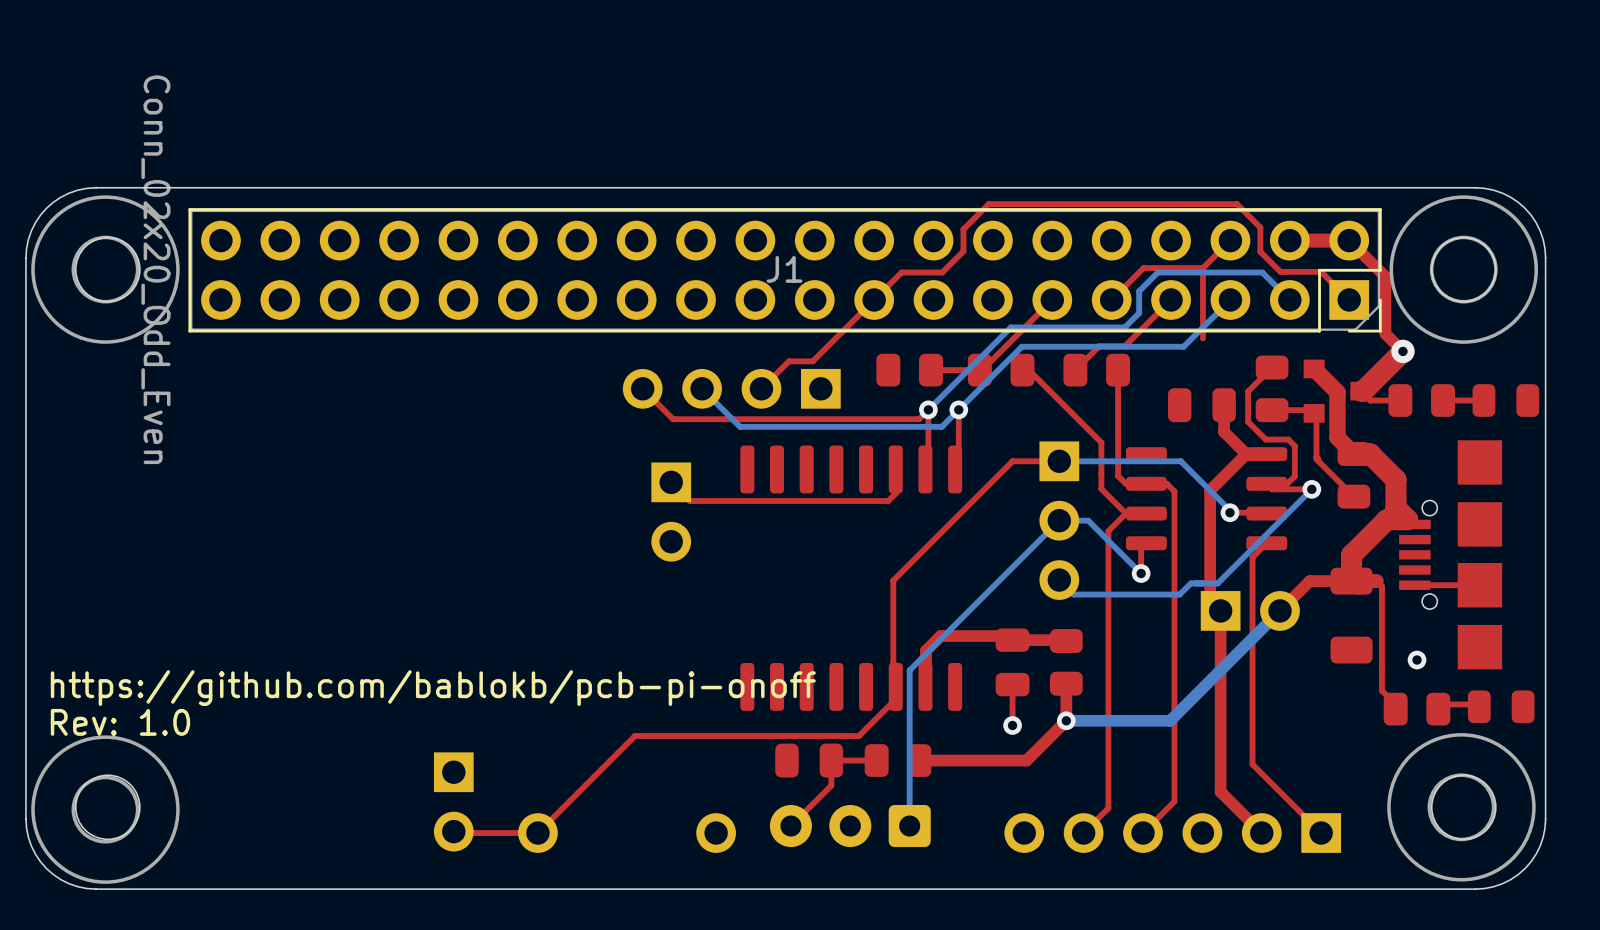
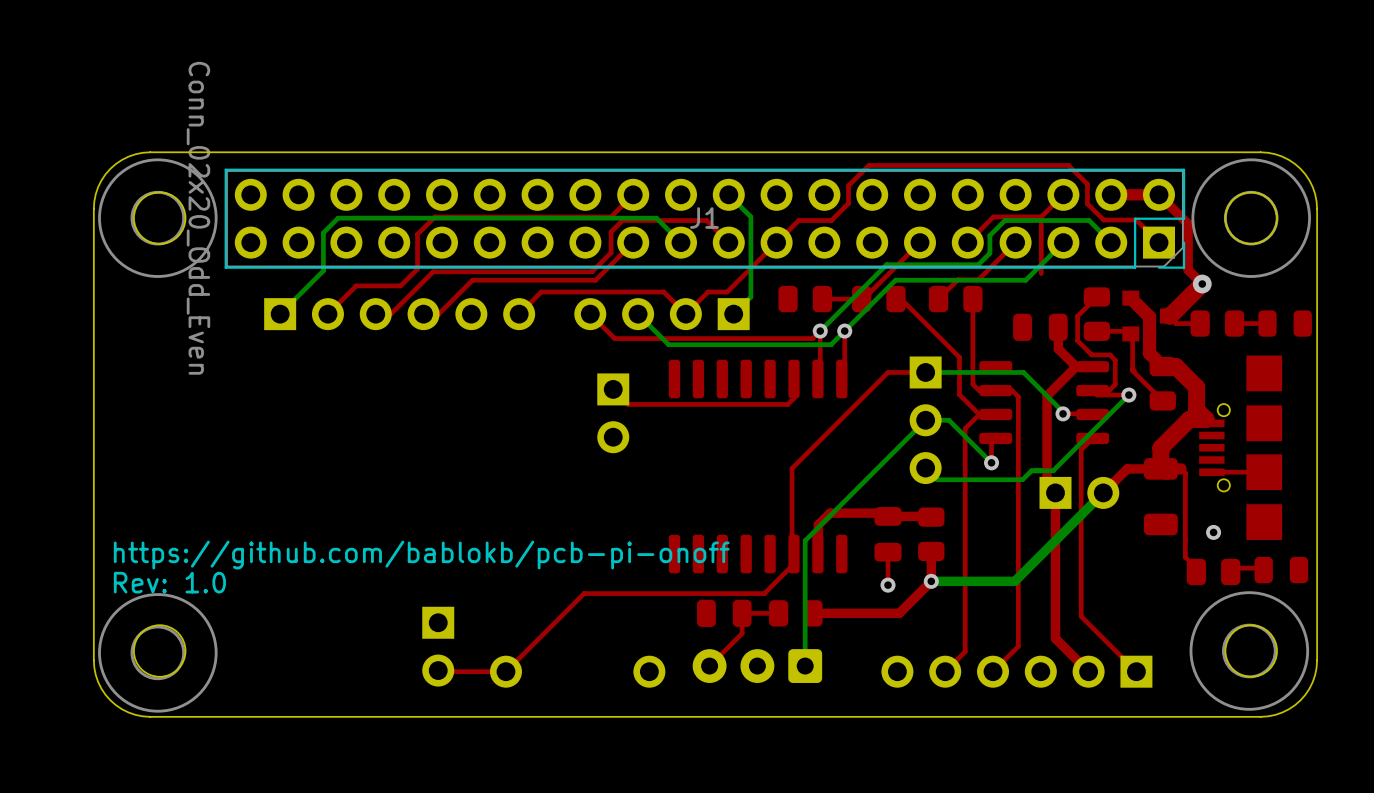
top track: none -> (633, 194) (611, 216) (434, 216) (417, 234) (417, 268) (400, 285) (356, 285) (327, 314)
bottom track: none -> (728, 194) (750, 216) (750, 296) (733, 314)
top track: none -> (633, 242) (595, 280) (472, 280) (438, 314) (423, 314)
bottom track: none -> (681, 242) (656, 218) (338, 218) (323, 232) (323, 270) (280, 314)
top track: none -> (728, 242) (706, 220) (622, 220) (611, 232) (611, 252) (592, 271) (433, 271) (390, 314) (375, 314)
part: none -> (399, 314)
top track: none -> (685, 314) (663, 292) (541, 292) (519, 314)

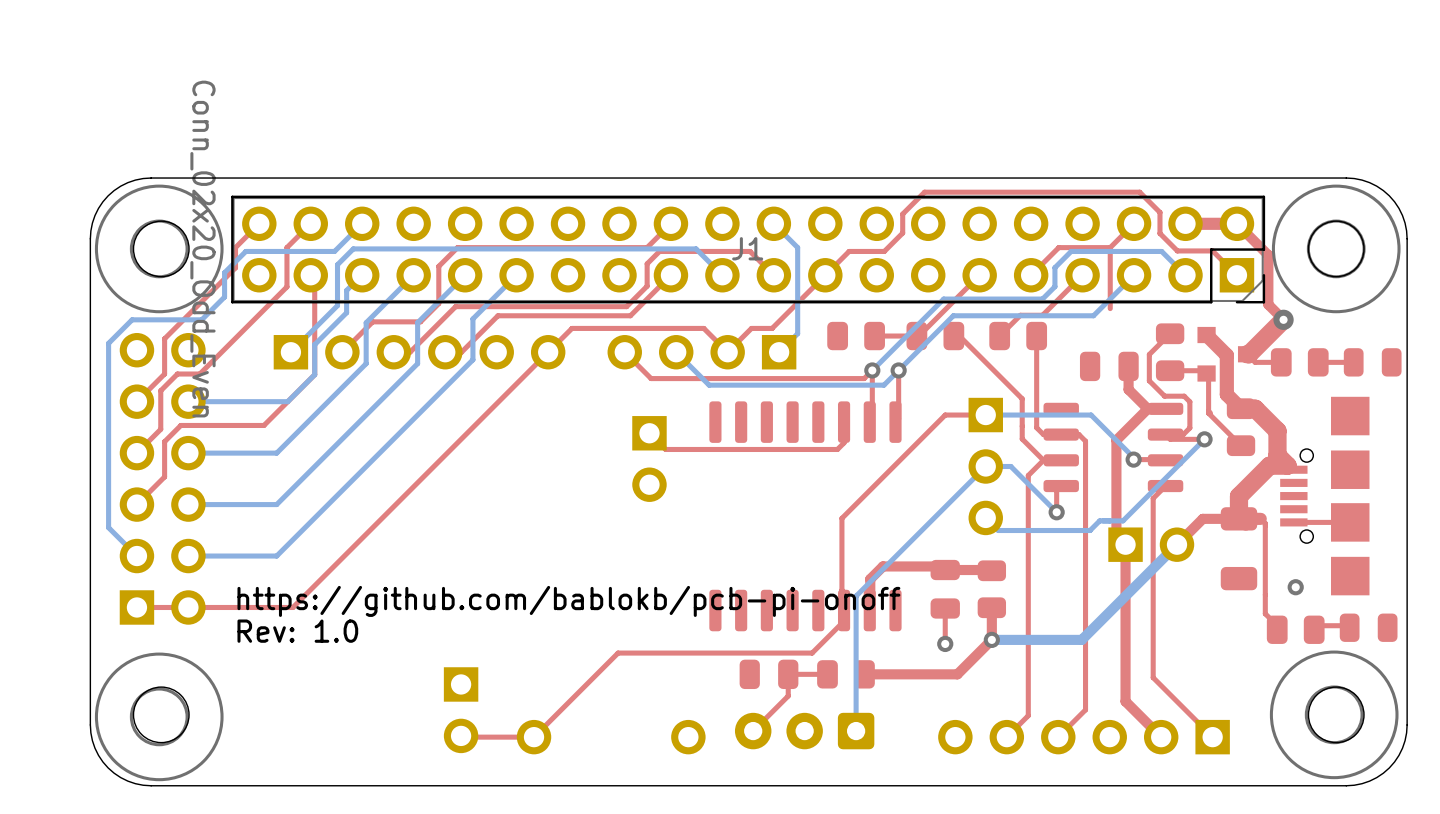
top track: none -> (259, 223) (235, 247) (235, 267) (164, 338) (164, 374) (136, 401)
top track: none -> (310, 223) (286, 247) (286, 286) (199, 374) (177, 374) (160, 390) (160, 429) (136, 453)
bottom track: none -> (362, 223) (334, 251) (245, 251) (224, 272) (224, 297) (201, 319) (132, 319) (108, 343) (108, 527) (136, 556)
top track: none -> (310, 275) (314, 279) (314, 374) (263, 425) (180, 425) (164, 441) (164, 476) (136, 504)
bottom track: none -> (361, 275) (346, 290) (346, 312) (314, 344) (314, 374) (287, 401) (188, 401)
bottom track: none -> (413, 275) (366, 322) (366, 363) (276, 453) (188, 453)
bottom track: none -> (465, 275) (417, 322) (417, 363) (276, 504) (188, 504)
bottom track: none -> (516, 275) (472, 318) (472, 359) (276, 556) (188, 556)
top track: none -> (548, 352) (292, 607) (136, 607)
part: none -> (162, 478)
text position: https://github.com/bablokb/pcb-pi-onoff (421, 555) -> https://github.com/bablokb/pcb-pi-onoff (568, 601)
text position: Rev: 1.0 (169, 582) -> Rev: 1.0 (297, 631)

